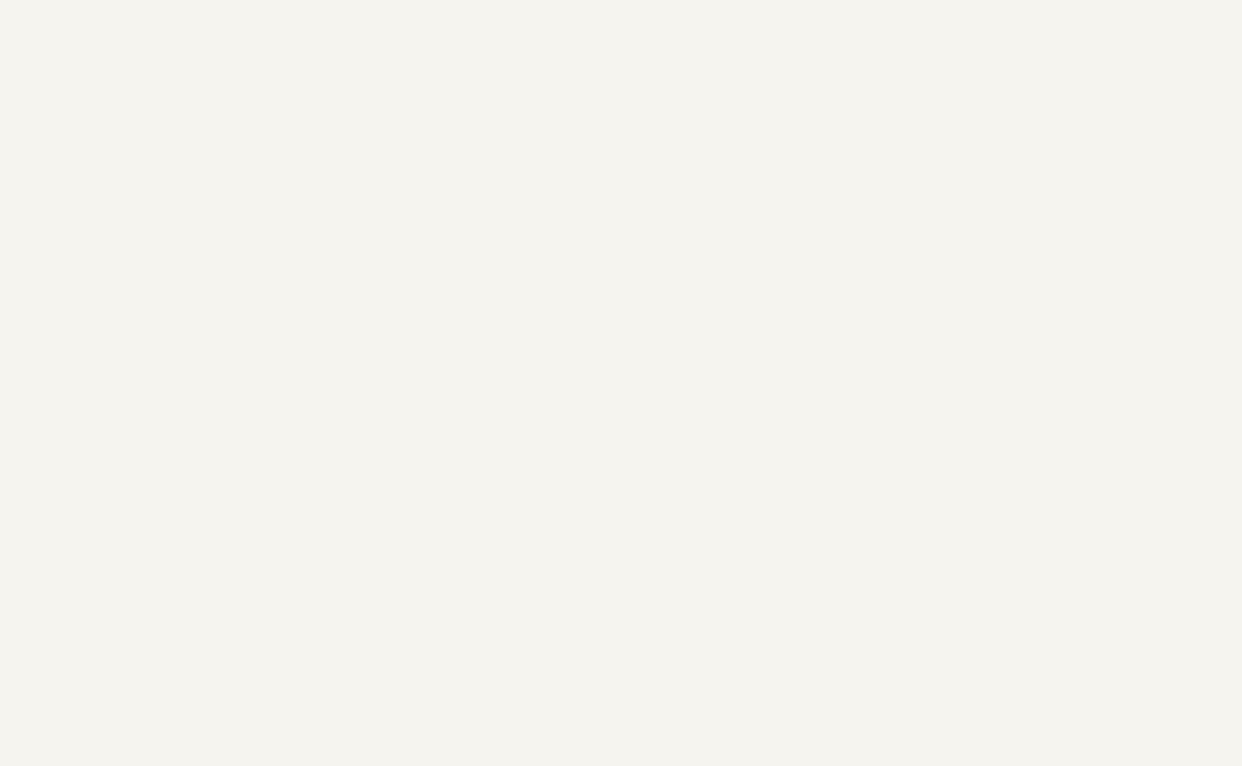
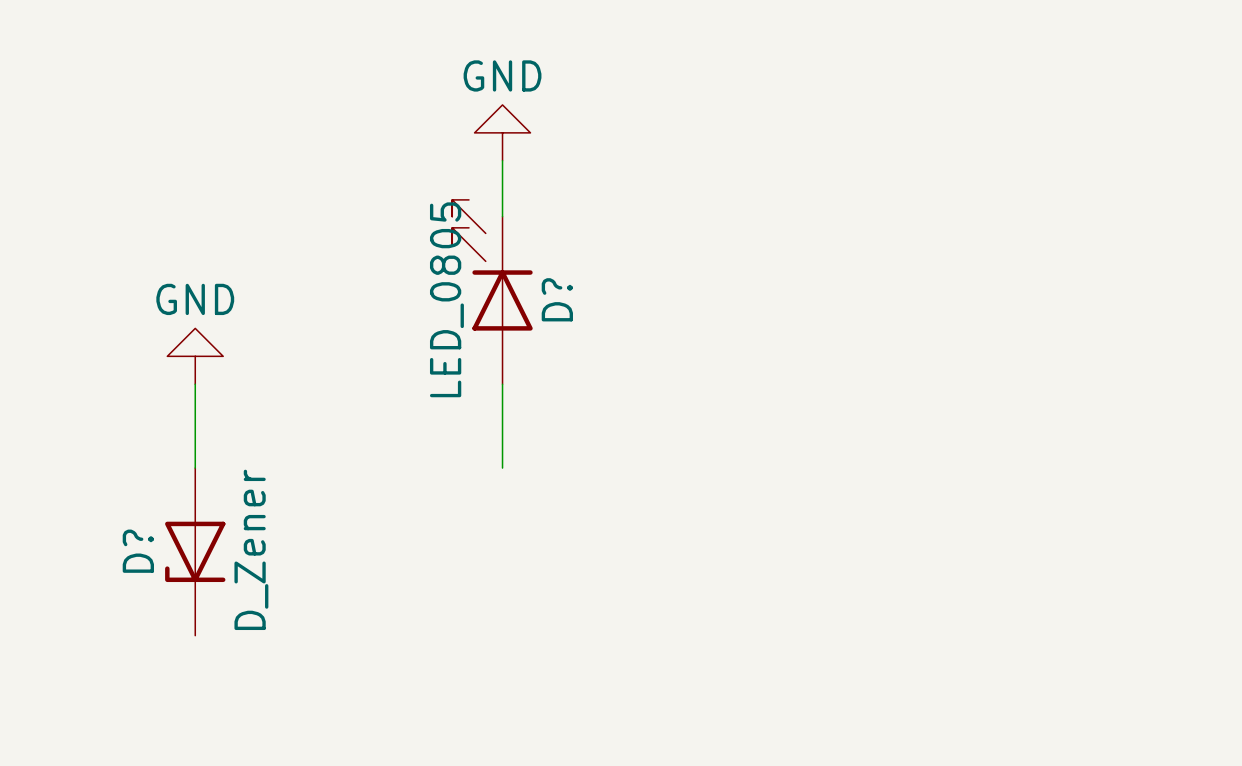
power symbol: none -> GND (502, 132)
wire: none -> (502, 160) (502, 216)
D?: none -> LED_0805 (492, 292)
power symbol: none -> GND (195, 356)
wire: none -> (195, 384) (195, 468)
wire: none -> (502, 384) (502, 468)
D?: none -> D_Zener (195, 551)

